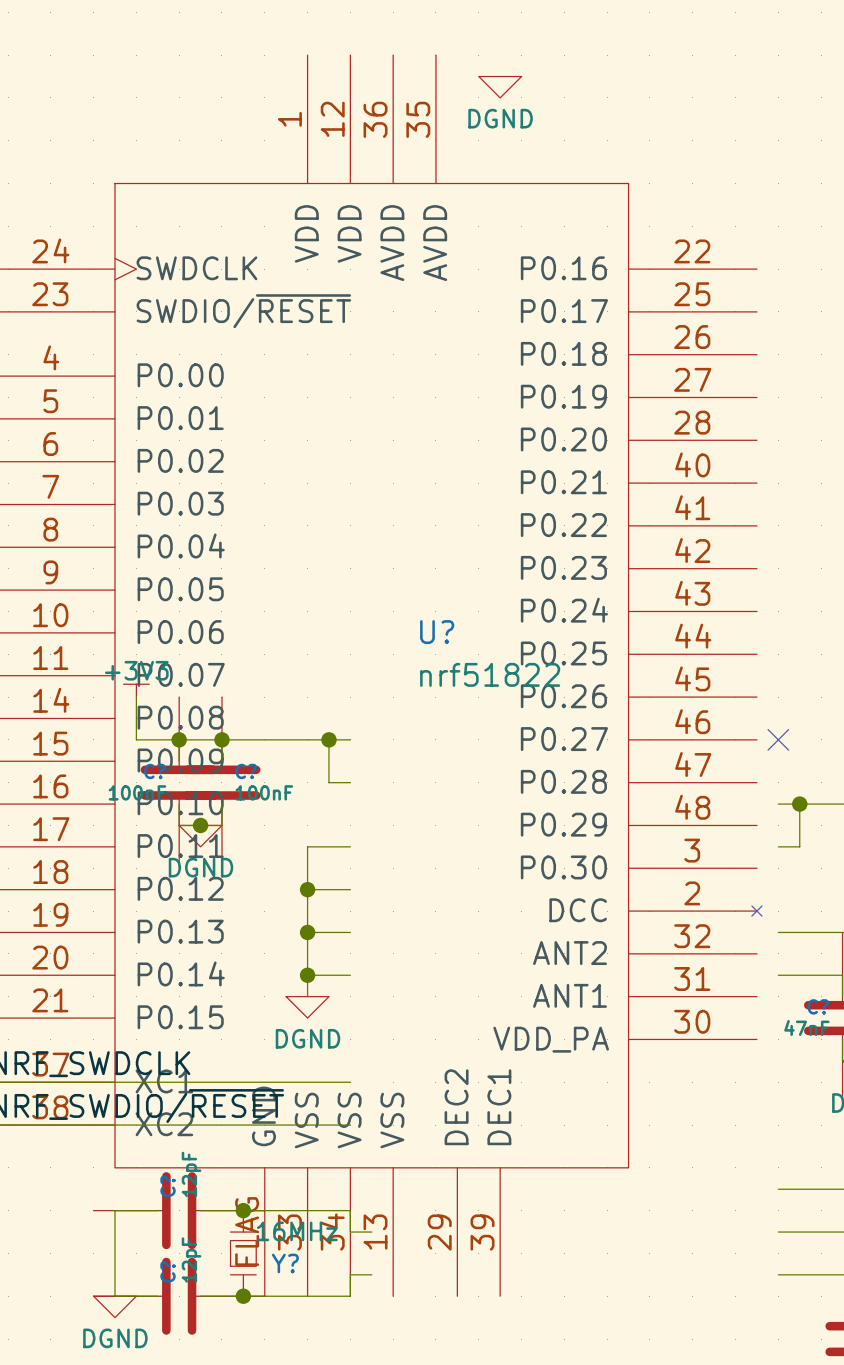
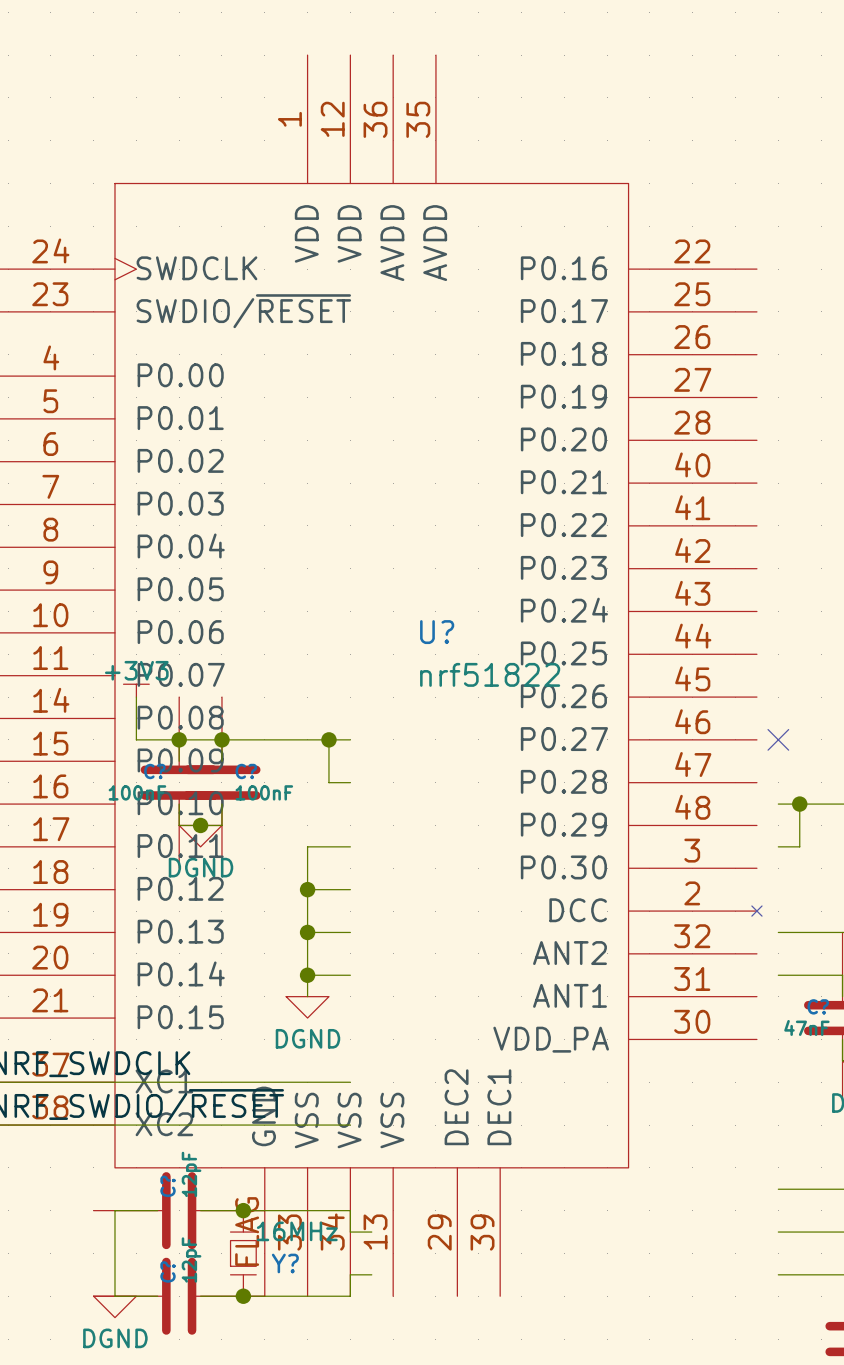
power symbol: DGND (500, 87) -> none

